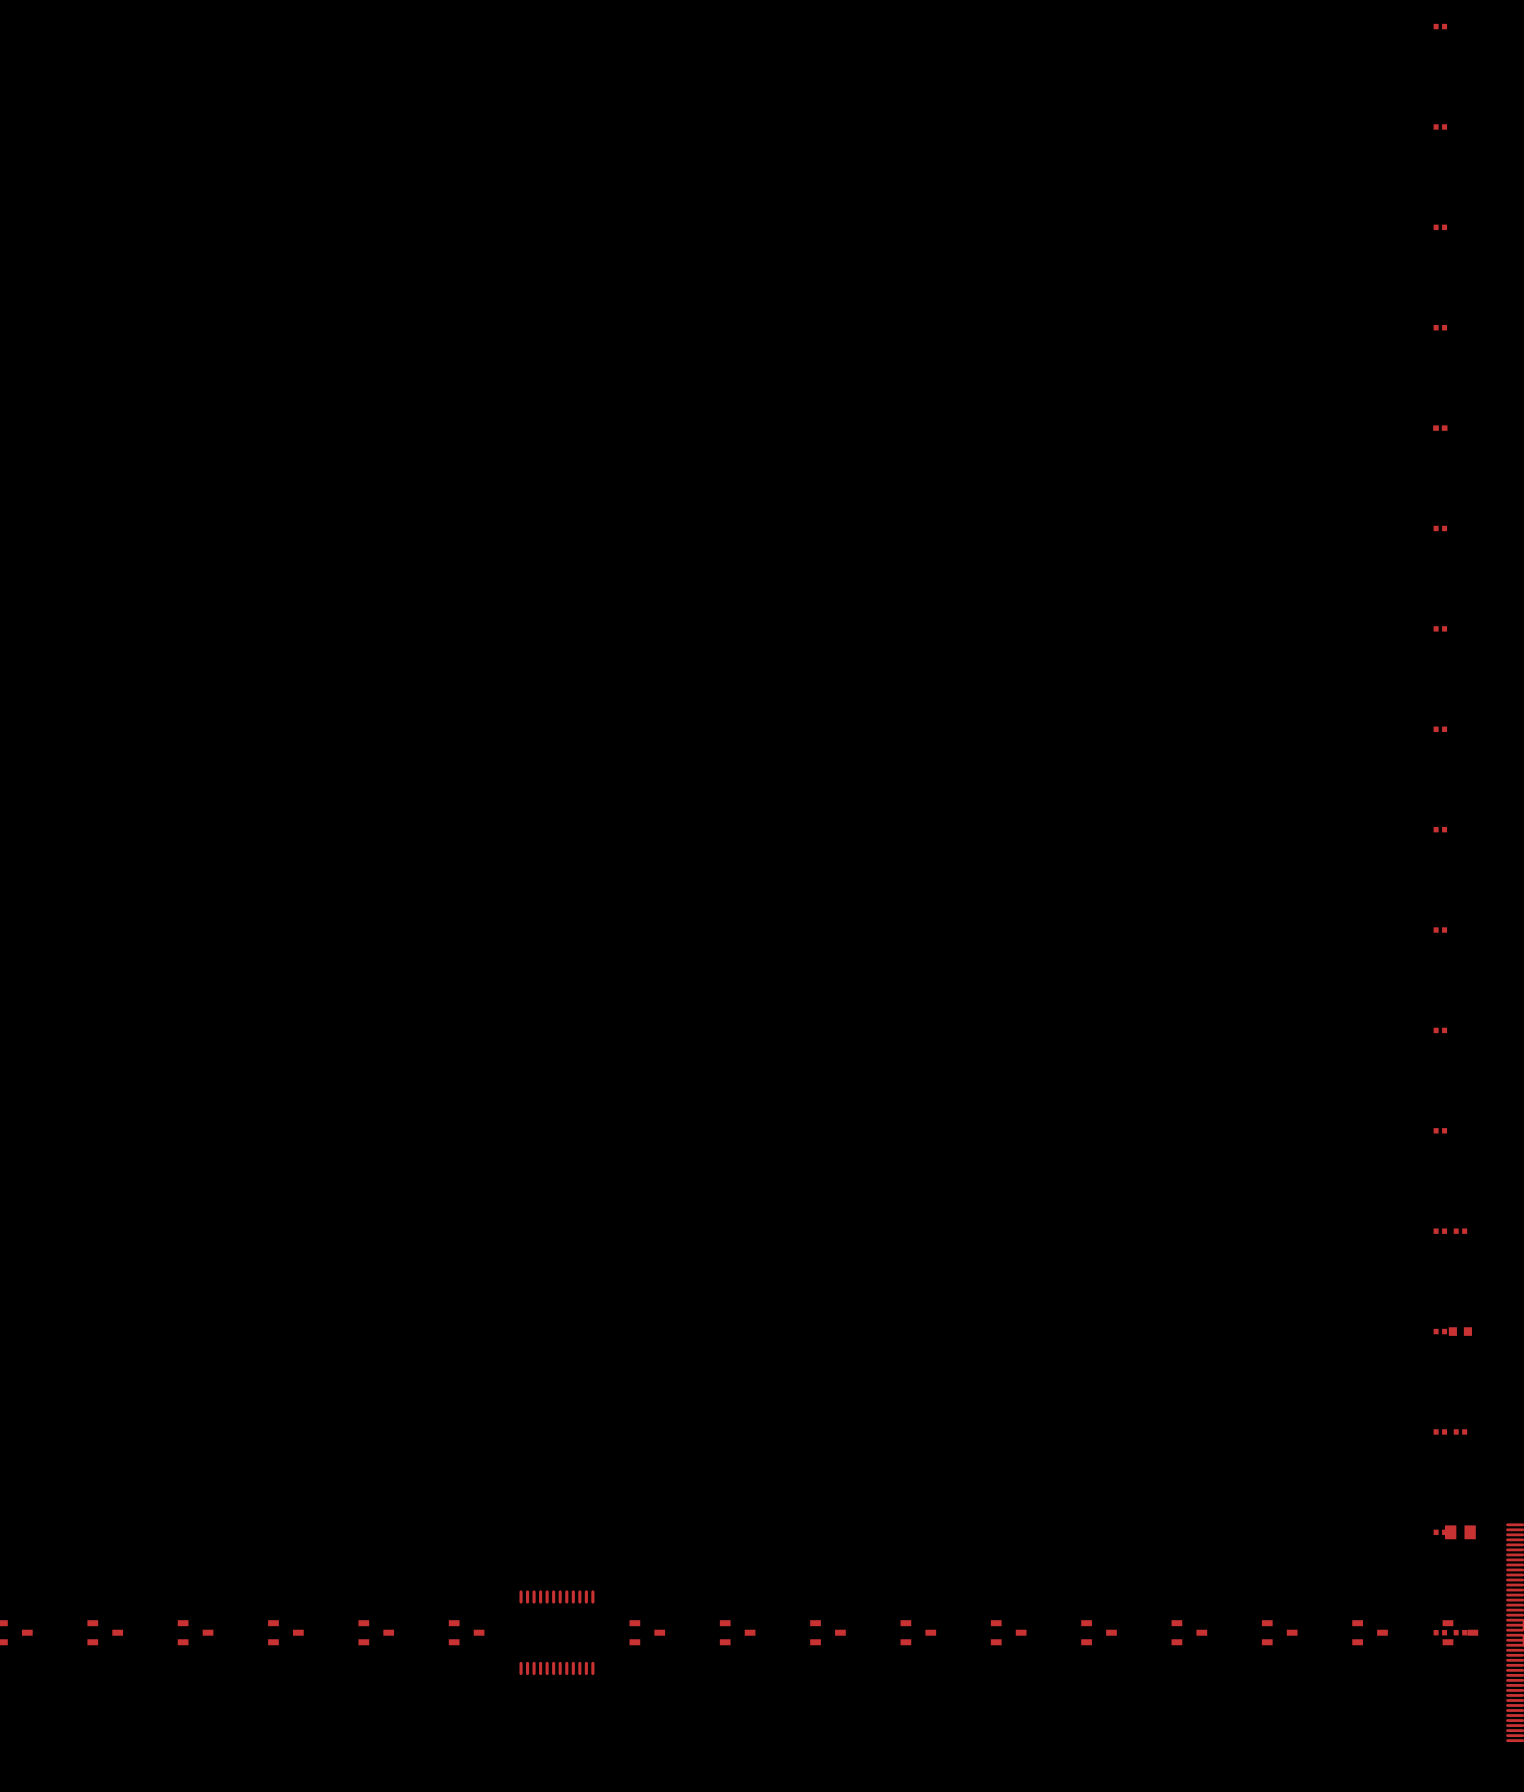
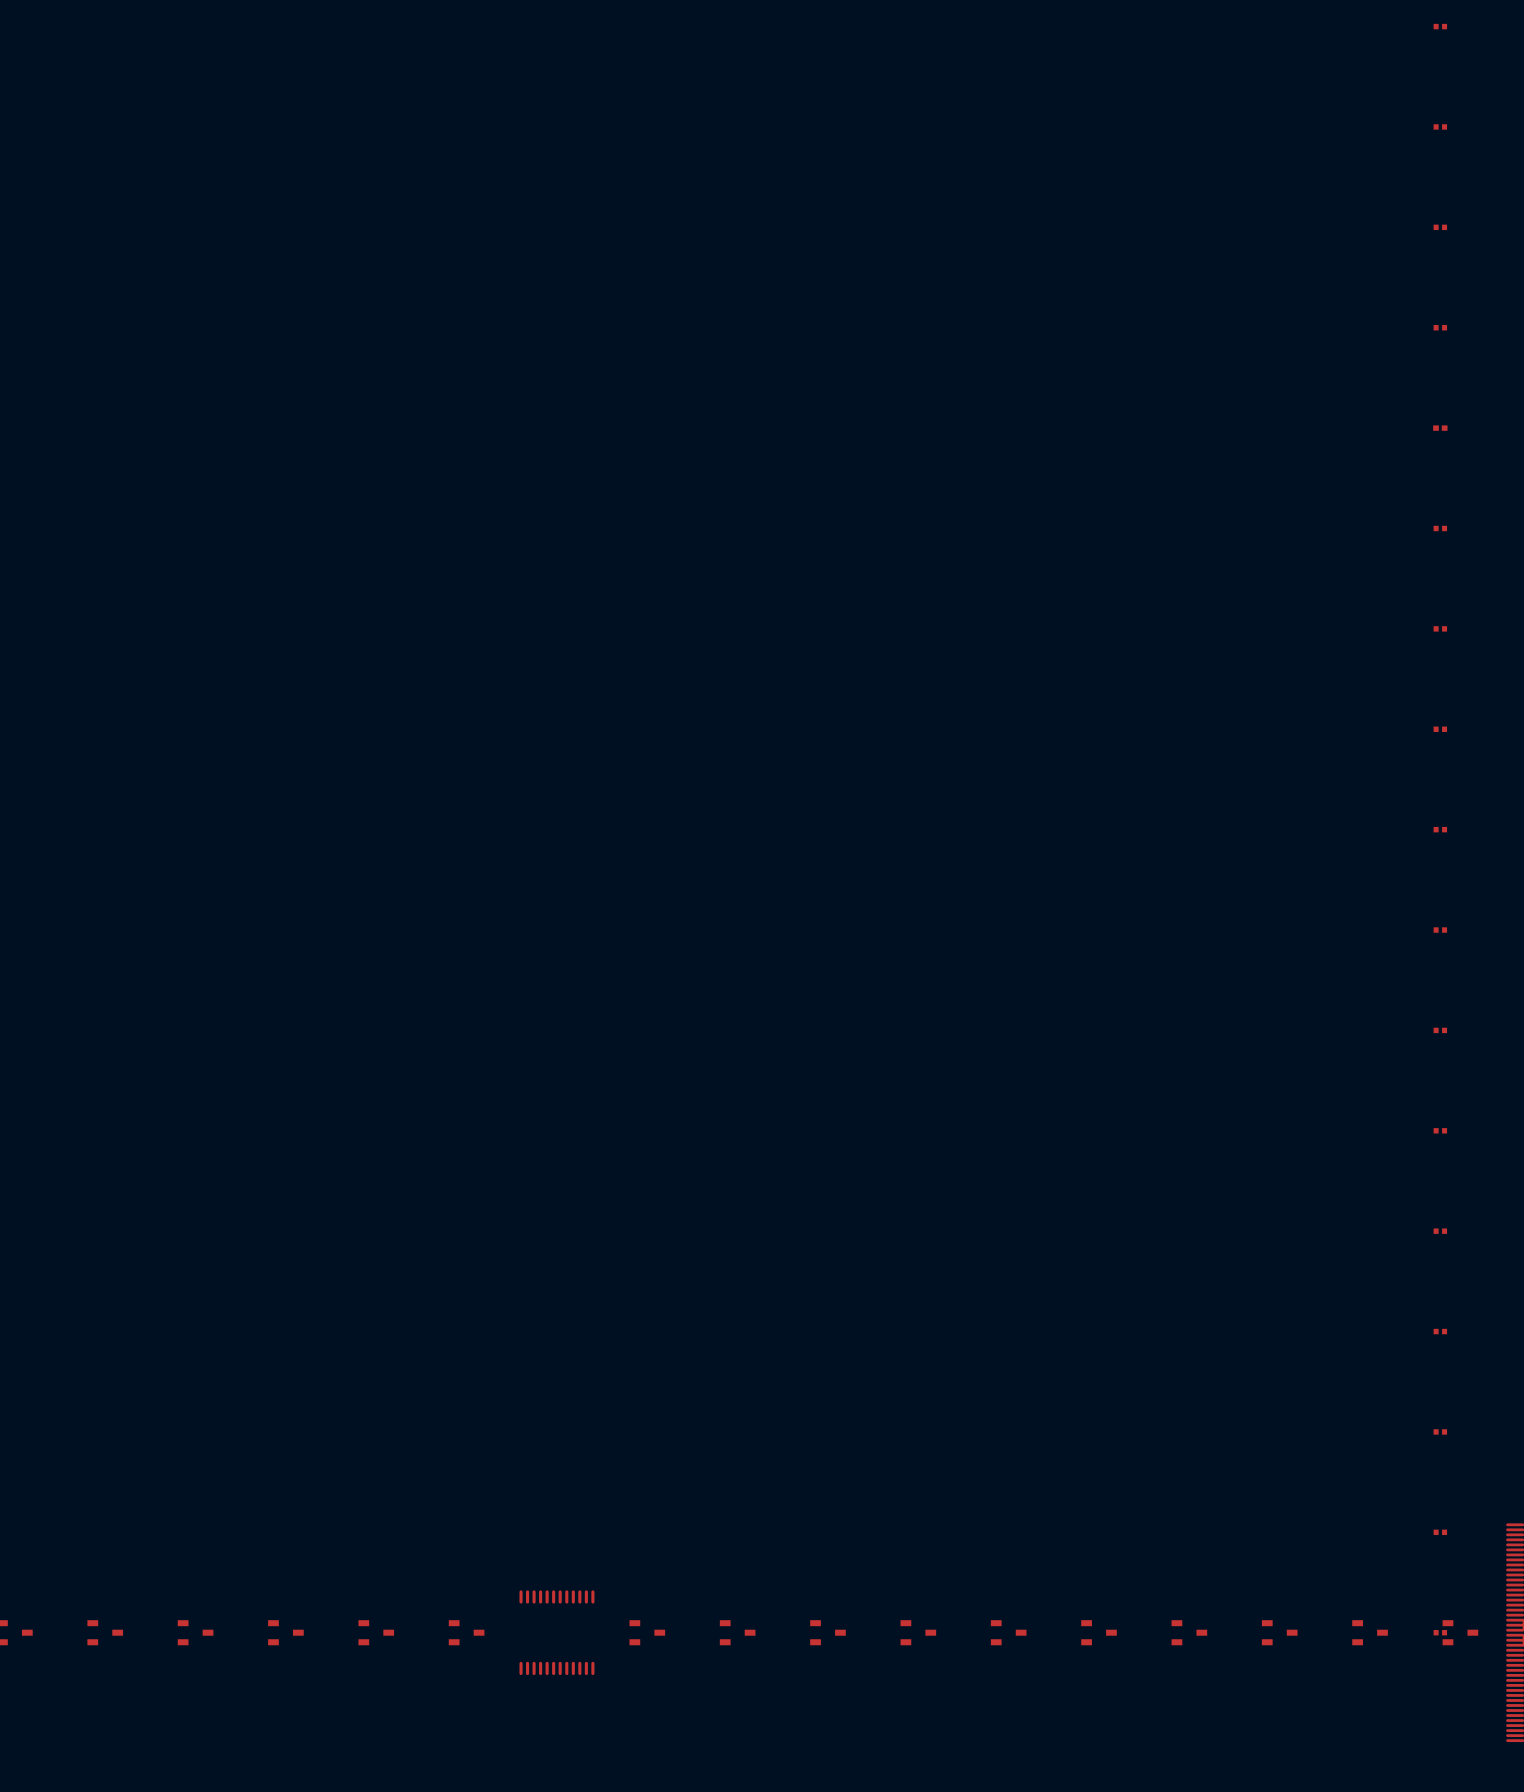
part: (1460, 1231) -> none
part: (1460, 1331) -> none
part: (1460, 1431) -> none
part: (1460, 1532) -> none
part: (1460, 1632) -> none

